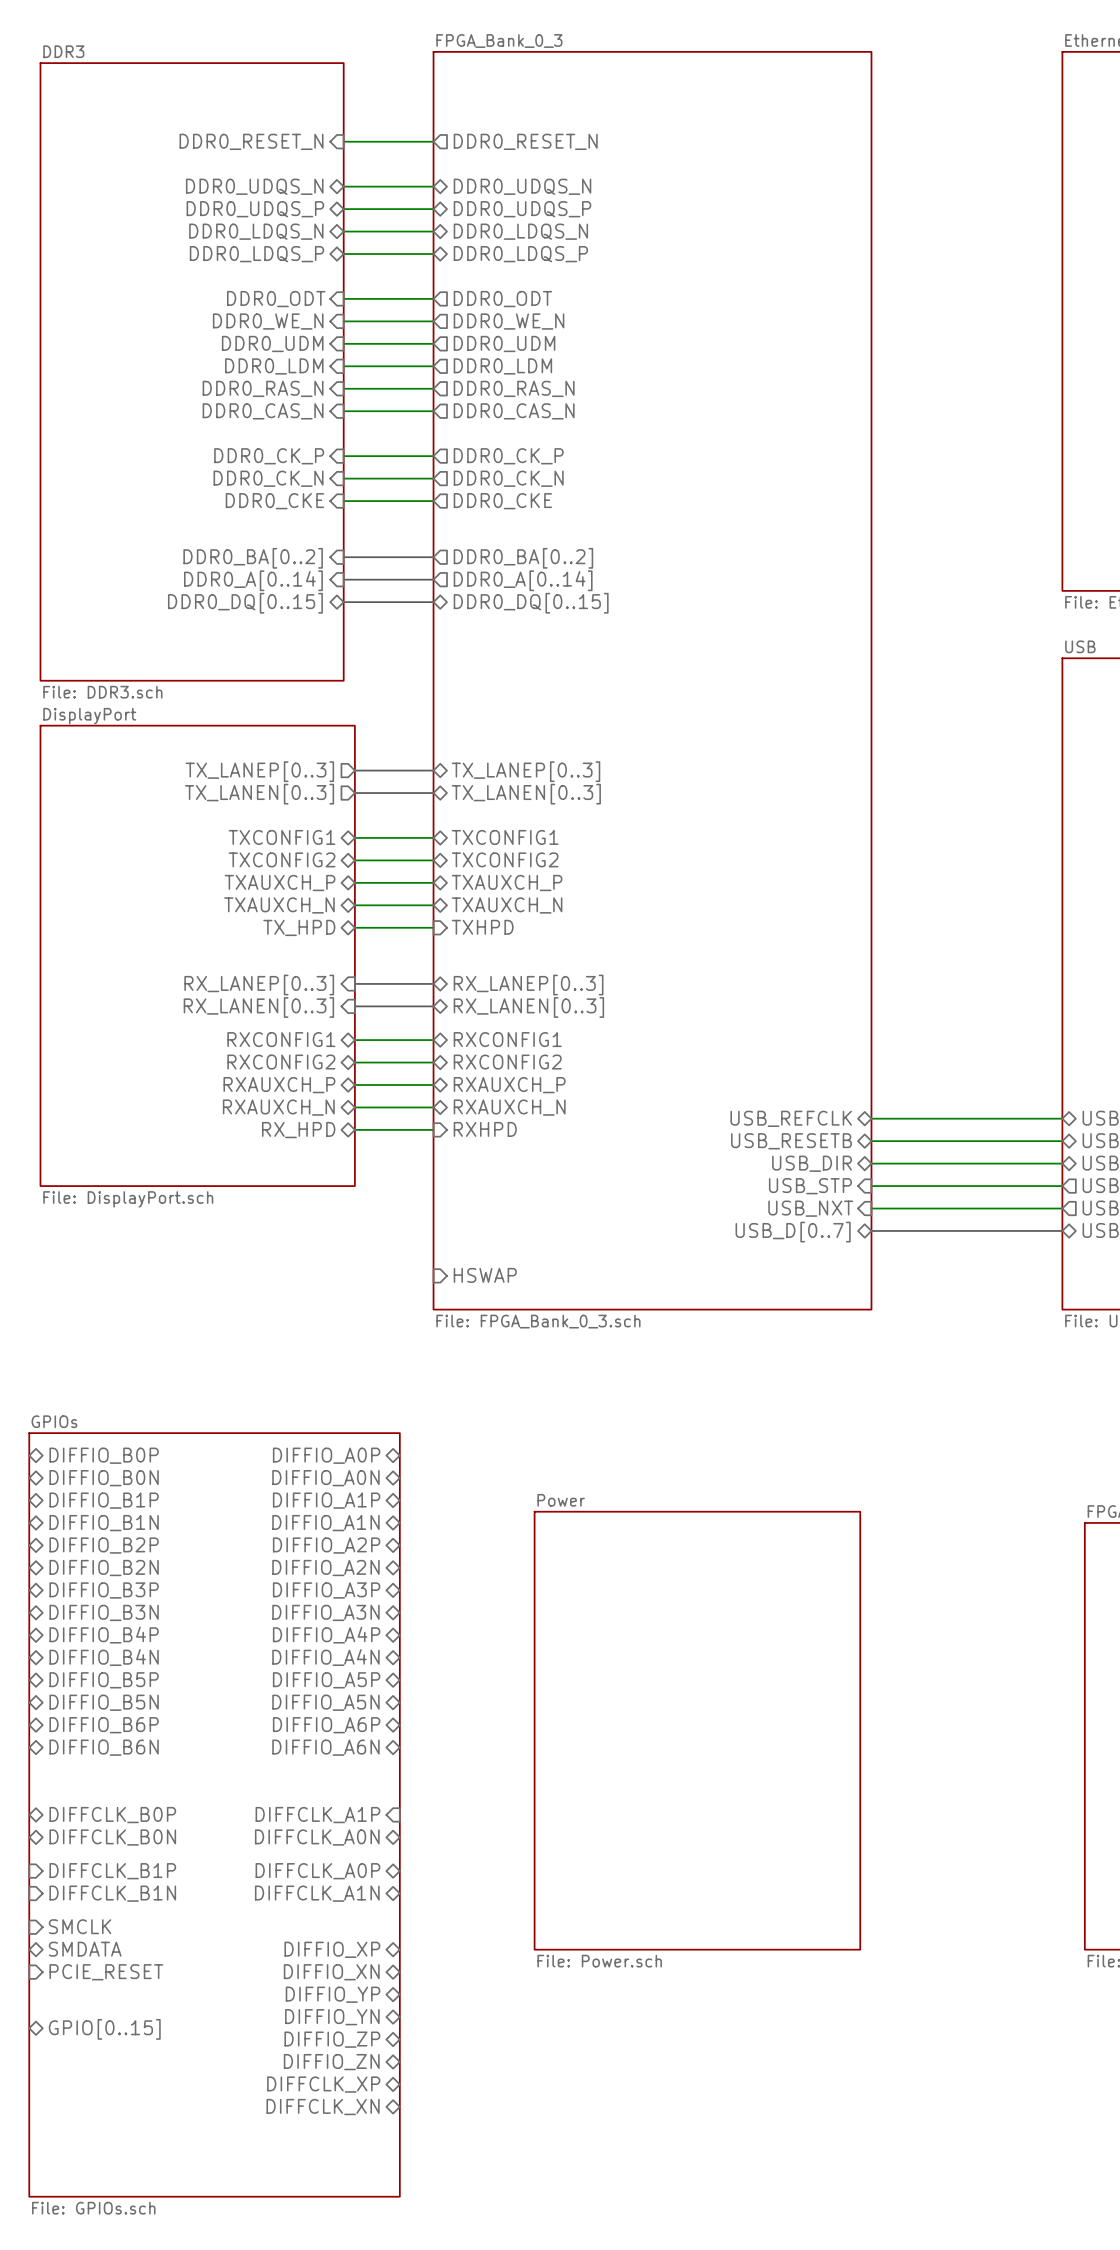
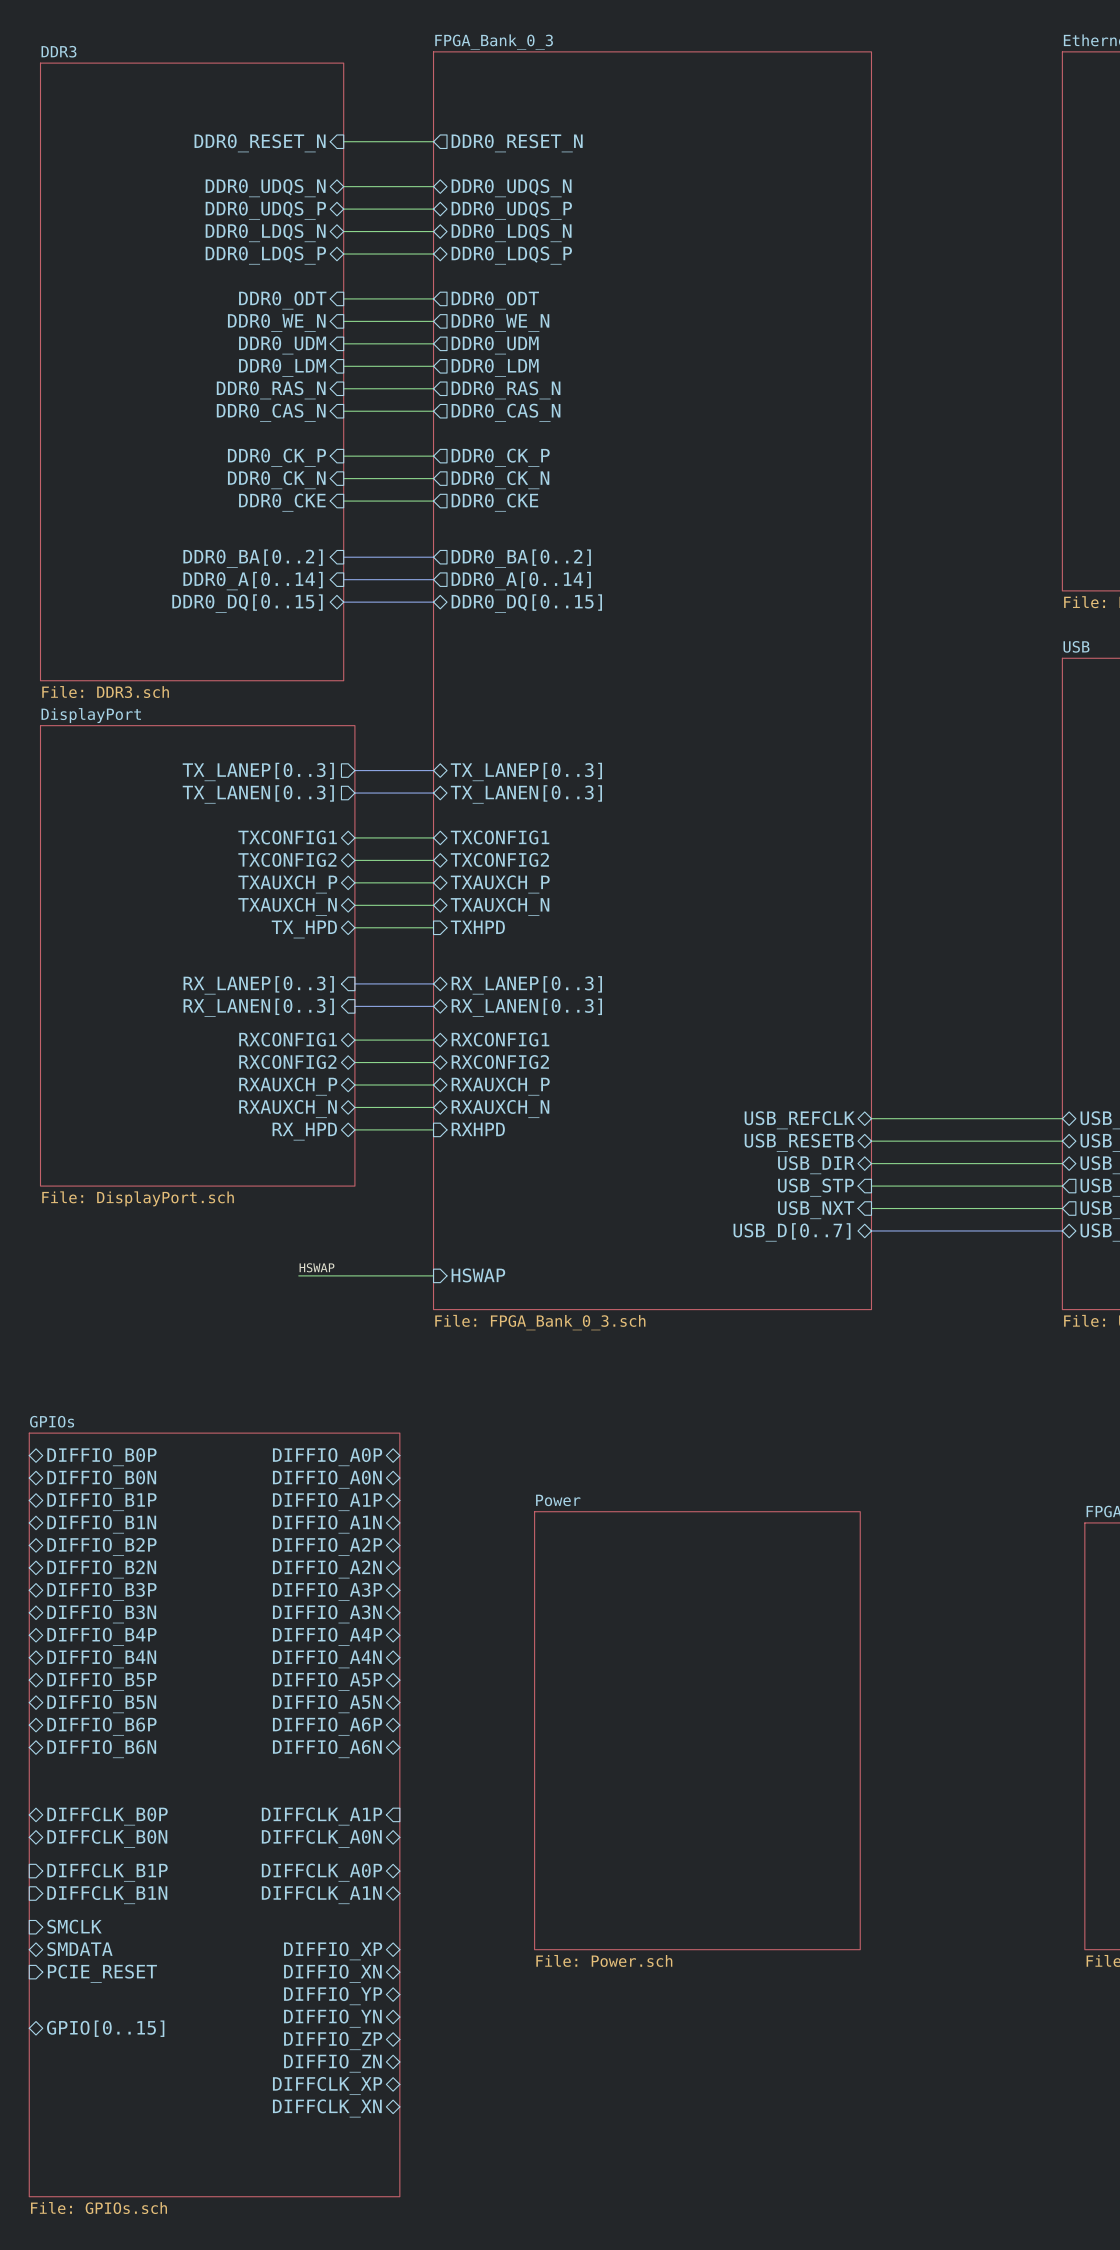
label: none -> HSWAP (316, 1267)
wire: none -> (298, 1275) (433, 1275)

